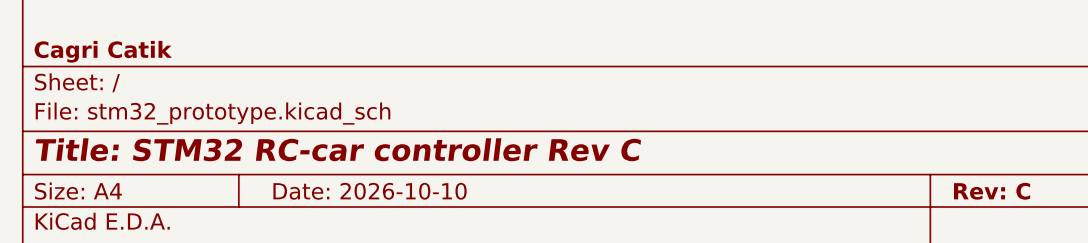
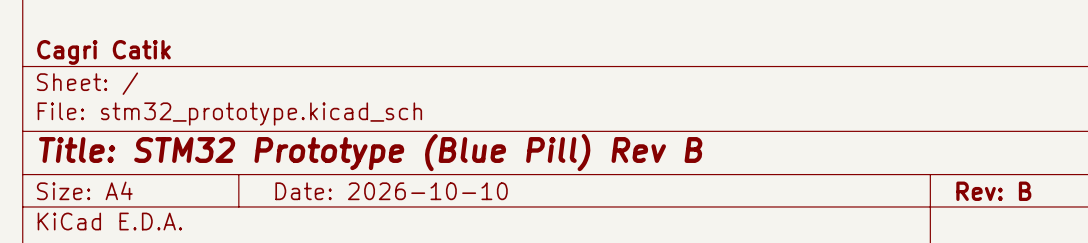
title block: Title: STM32 RC-car controller Rev C (338, 149) -> Title: STM32 Prototype (Blue Pill) Rev B (370, 152)
title block: Rev: C (992, 191) -> Rev: B (993, 191)

